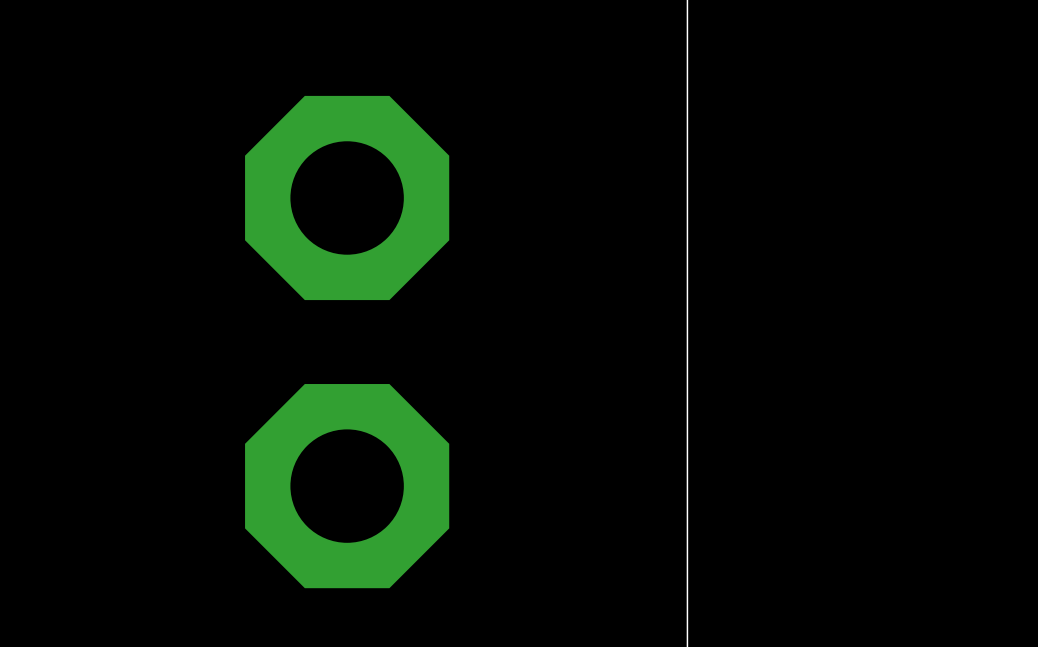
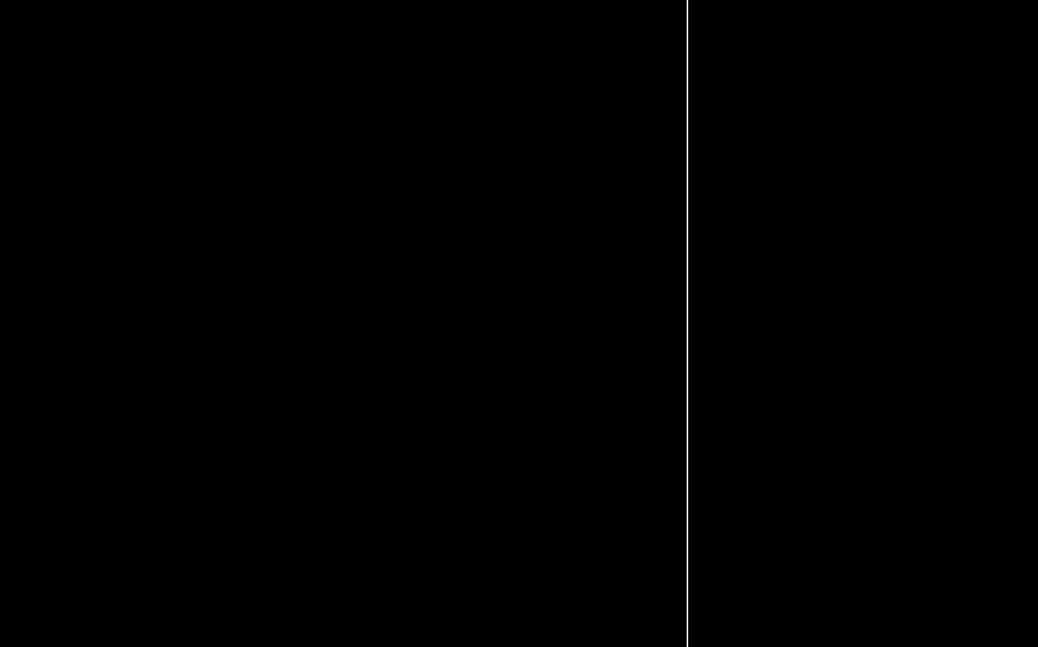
part: (347, 342) -> none

